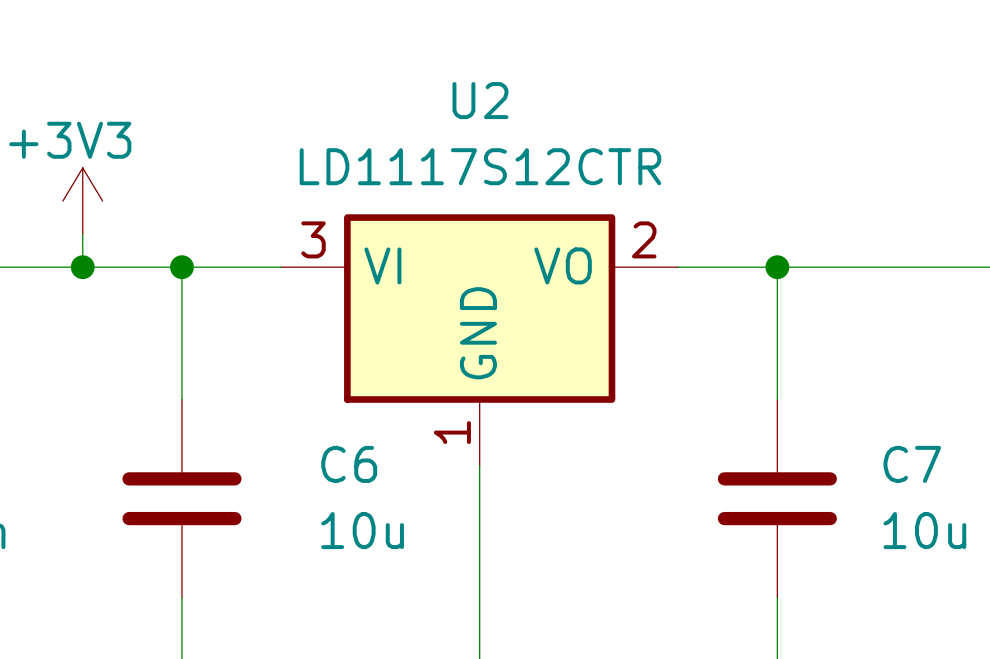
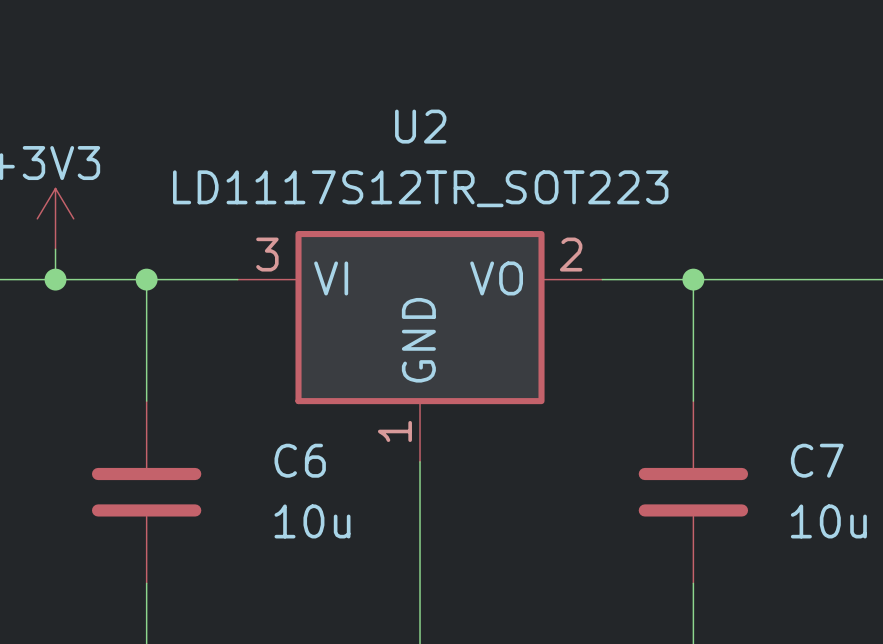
U2 value: LD1117S12CTR (480, 166) -> LD1117S12TR_SOT223 (420, 188)

